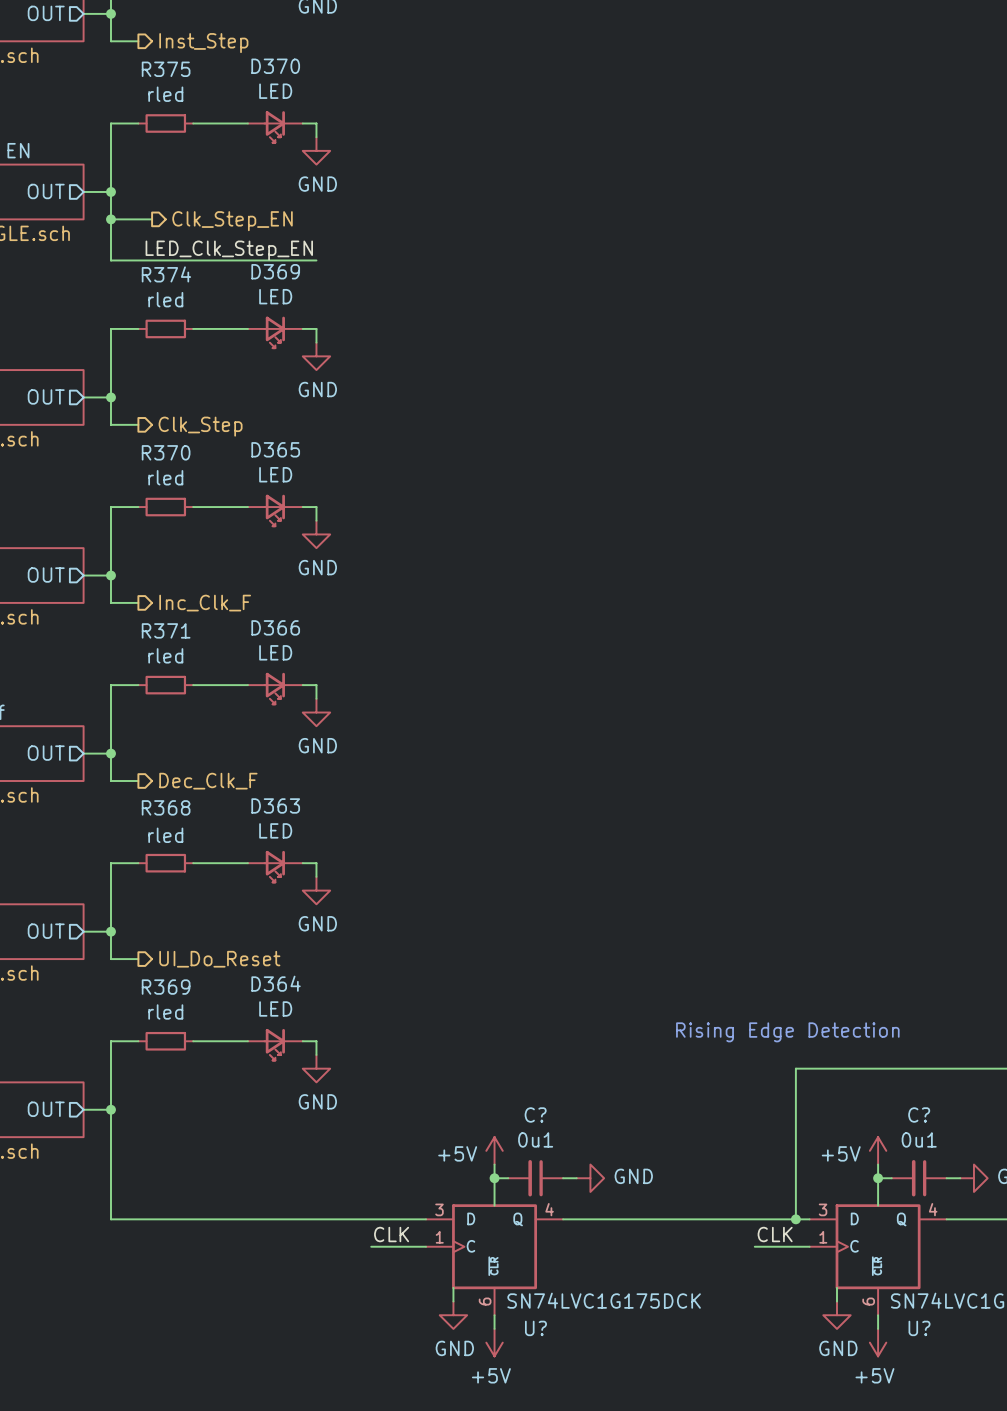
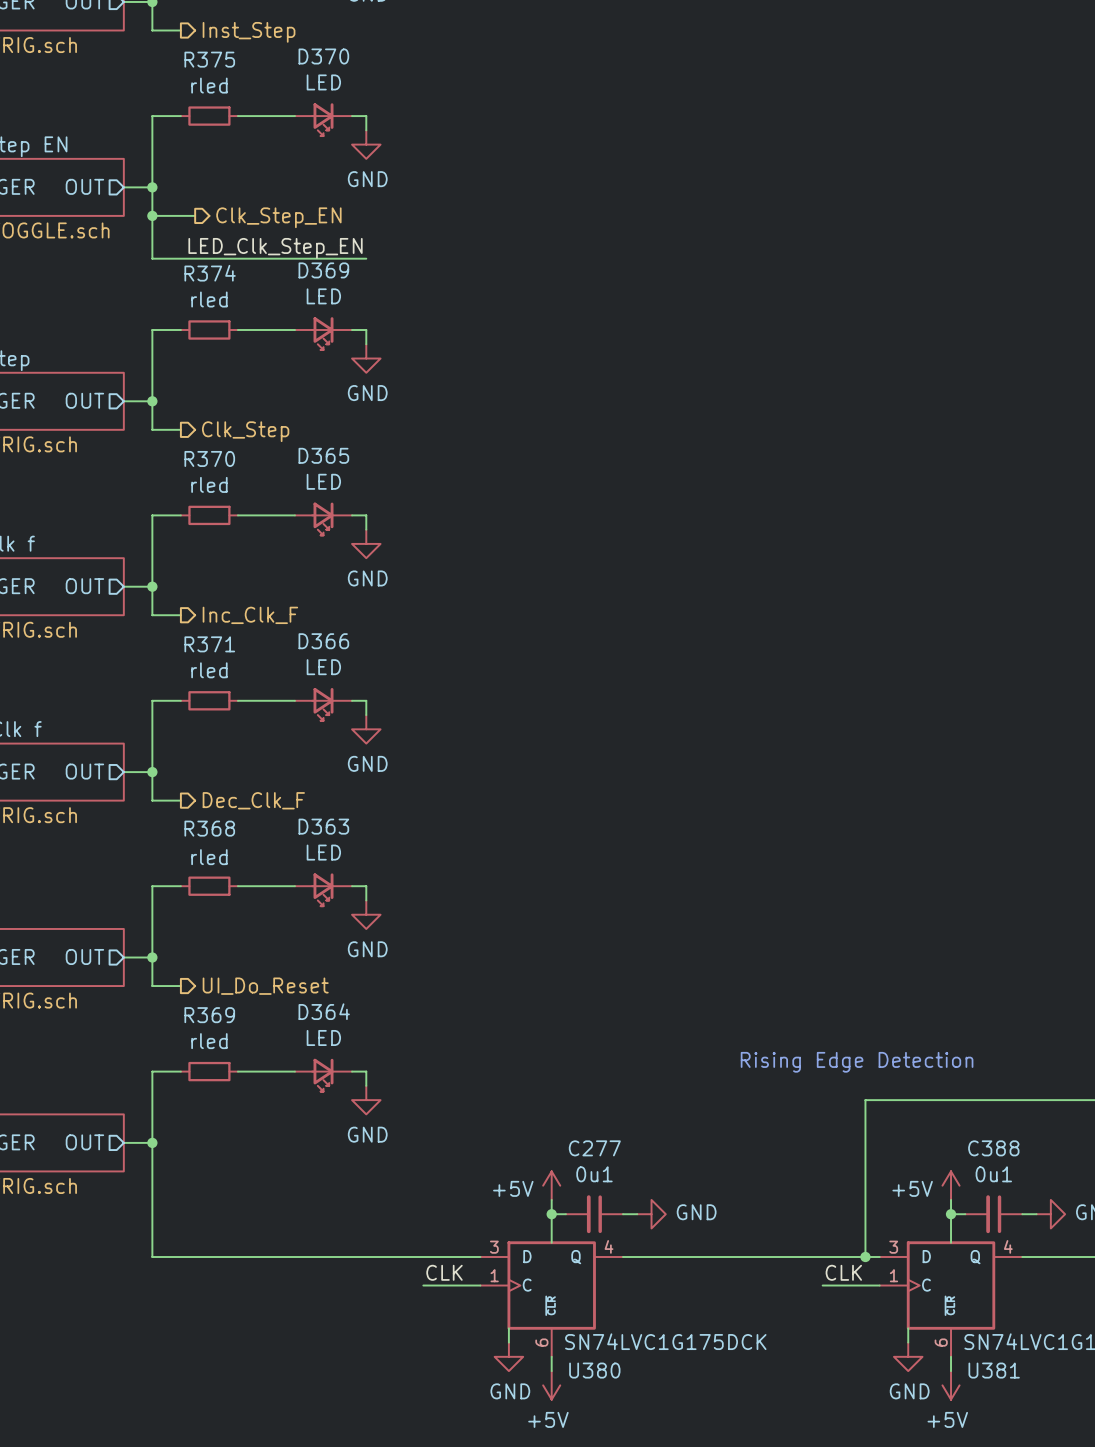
C? name: C? (535, 1115) -> C277 (594, 1148)
C? name: C? (919, 1115) -> C388 (993, 1148)
U? name: U? (535, 1328) -> U380 (594, 1370)
U? name: U? (919, 1328) -> U381 (994, 1370)

